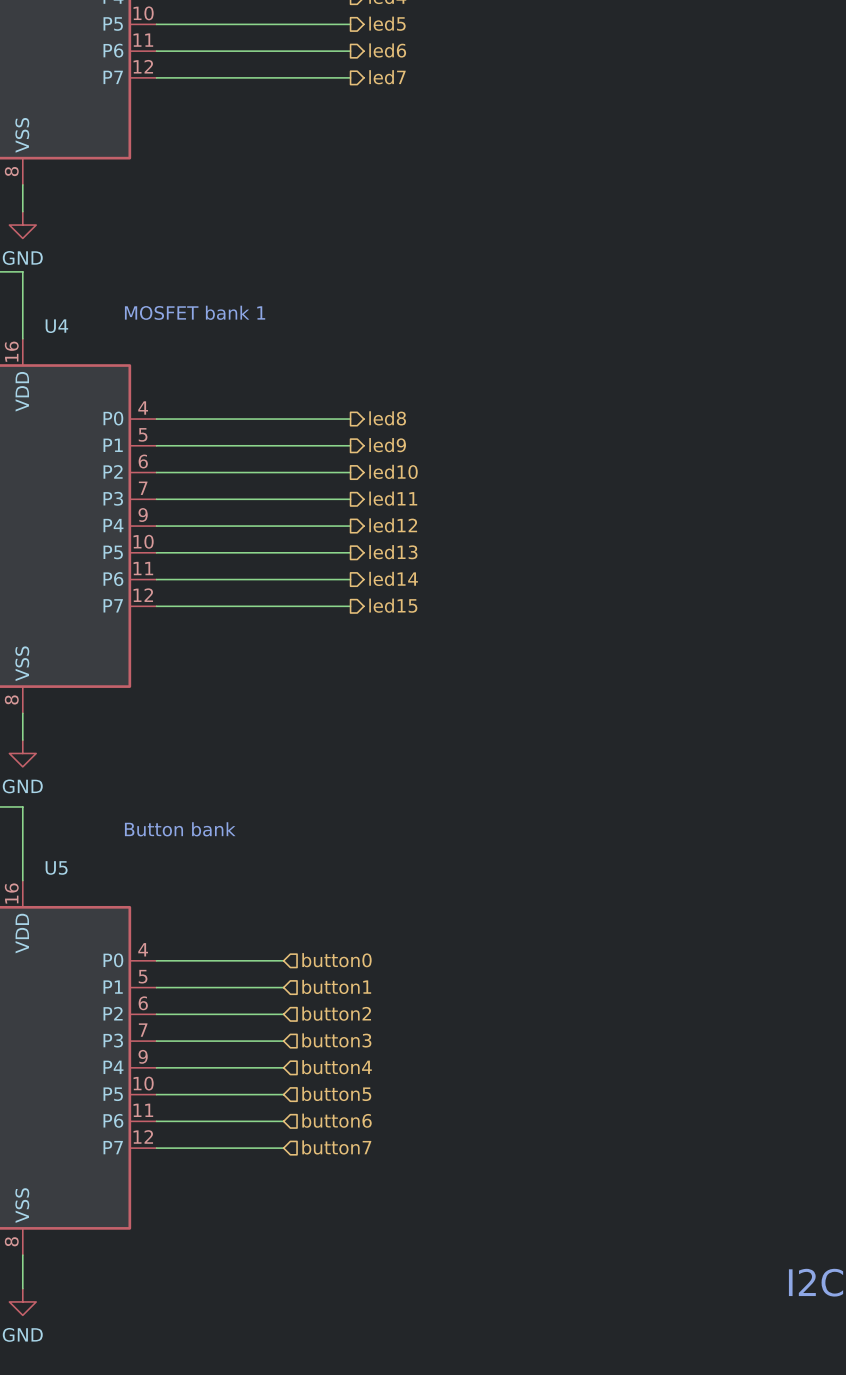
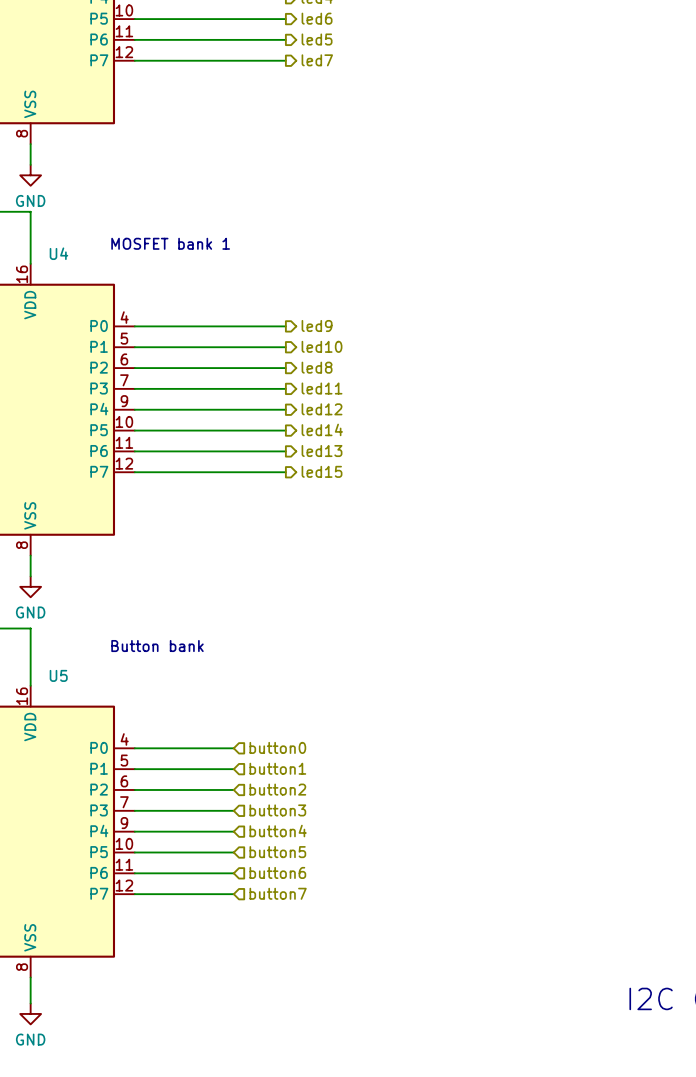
hierarchical label: led5 (387, 23) -> led6 (317, 18)
hierarchical label: led6 (387, 50) -> led5 (317, 39)
hierarchical label: led8 (387, 418) -> led9 (317, 326)
hierarchical label: led9 (387, 445) -> led10 (322, 346)
hierarchical label: led10 (393, 471) -> led8 (317, 367)
hierarchical label: led13 (393, 552) -> led14 (322, 429)
hierarchical label: led14 (393, 578) -> led13 (322, 451)

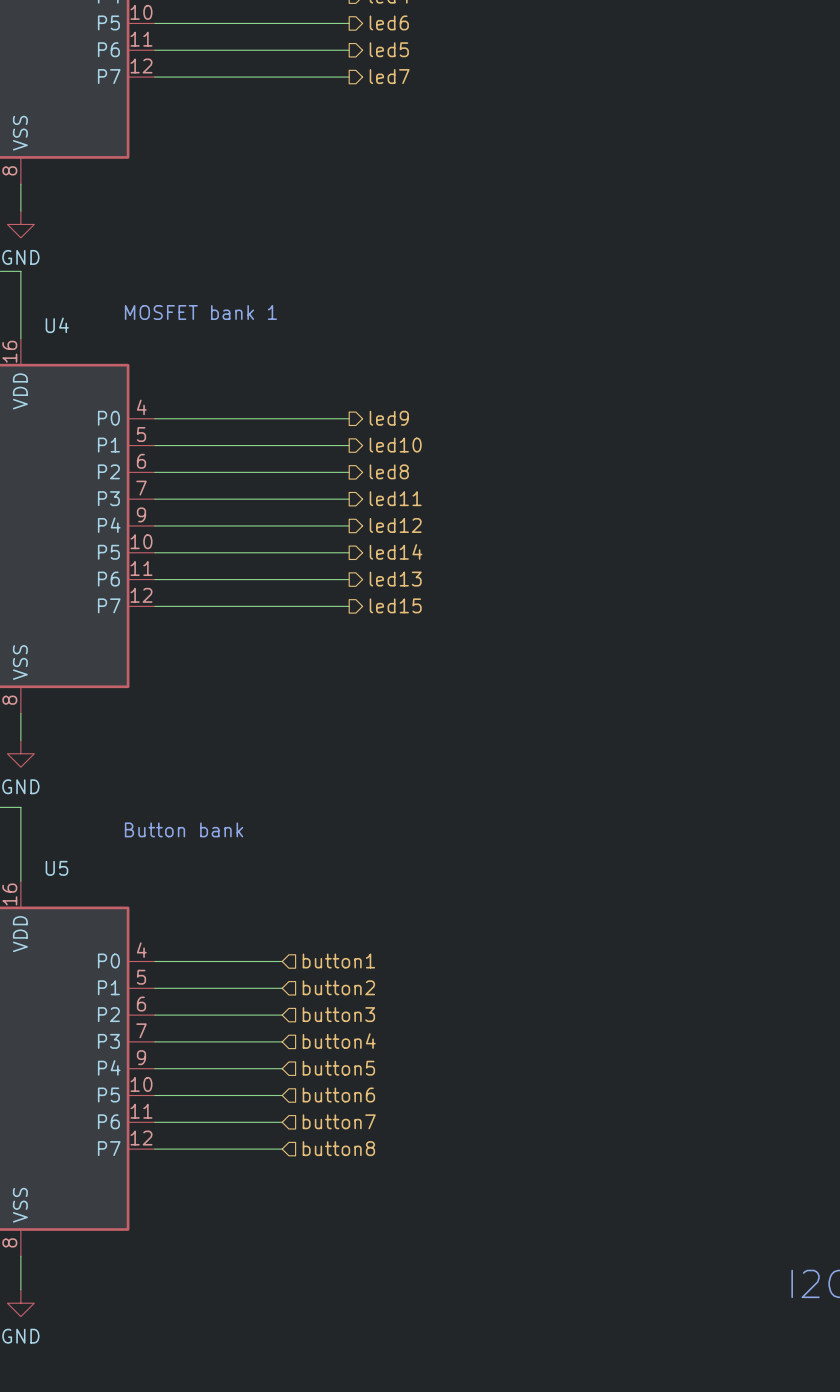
hierarchical label: button0 (277, 747) -> button1 (338, 960)
hierarchical label: button1 (277, 768) -> button2 (338, 987)
hierarchical label: button2 (277, 789) -> button3 (338, 1014)
hierarchical label: button3 (277, 810) -> button4 (339, 1041)
hierarchical label: button4 (278, 831) -> button5 (338, 1068)
hierarchical label: button5 (277, 852) -> button6 (338, 1095)
hierarchical label: button6 (277, 872) -> button7 (339, 1121)
hierarchical label: button7 (278, 893) -> button8 (338, 1148)

